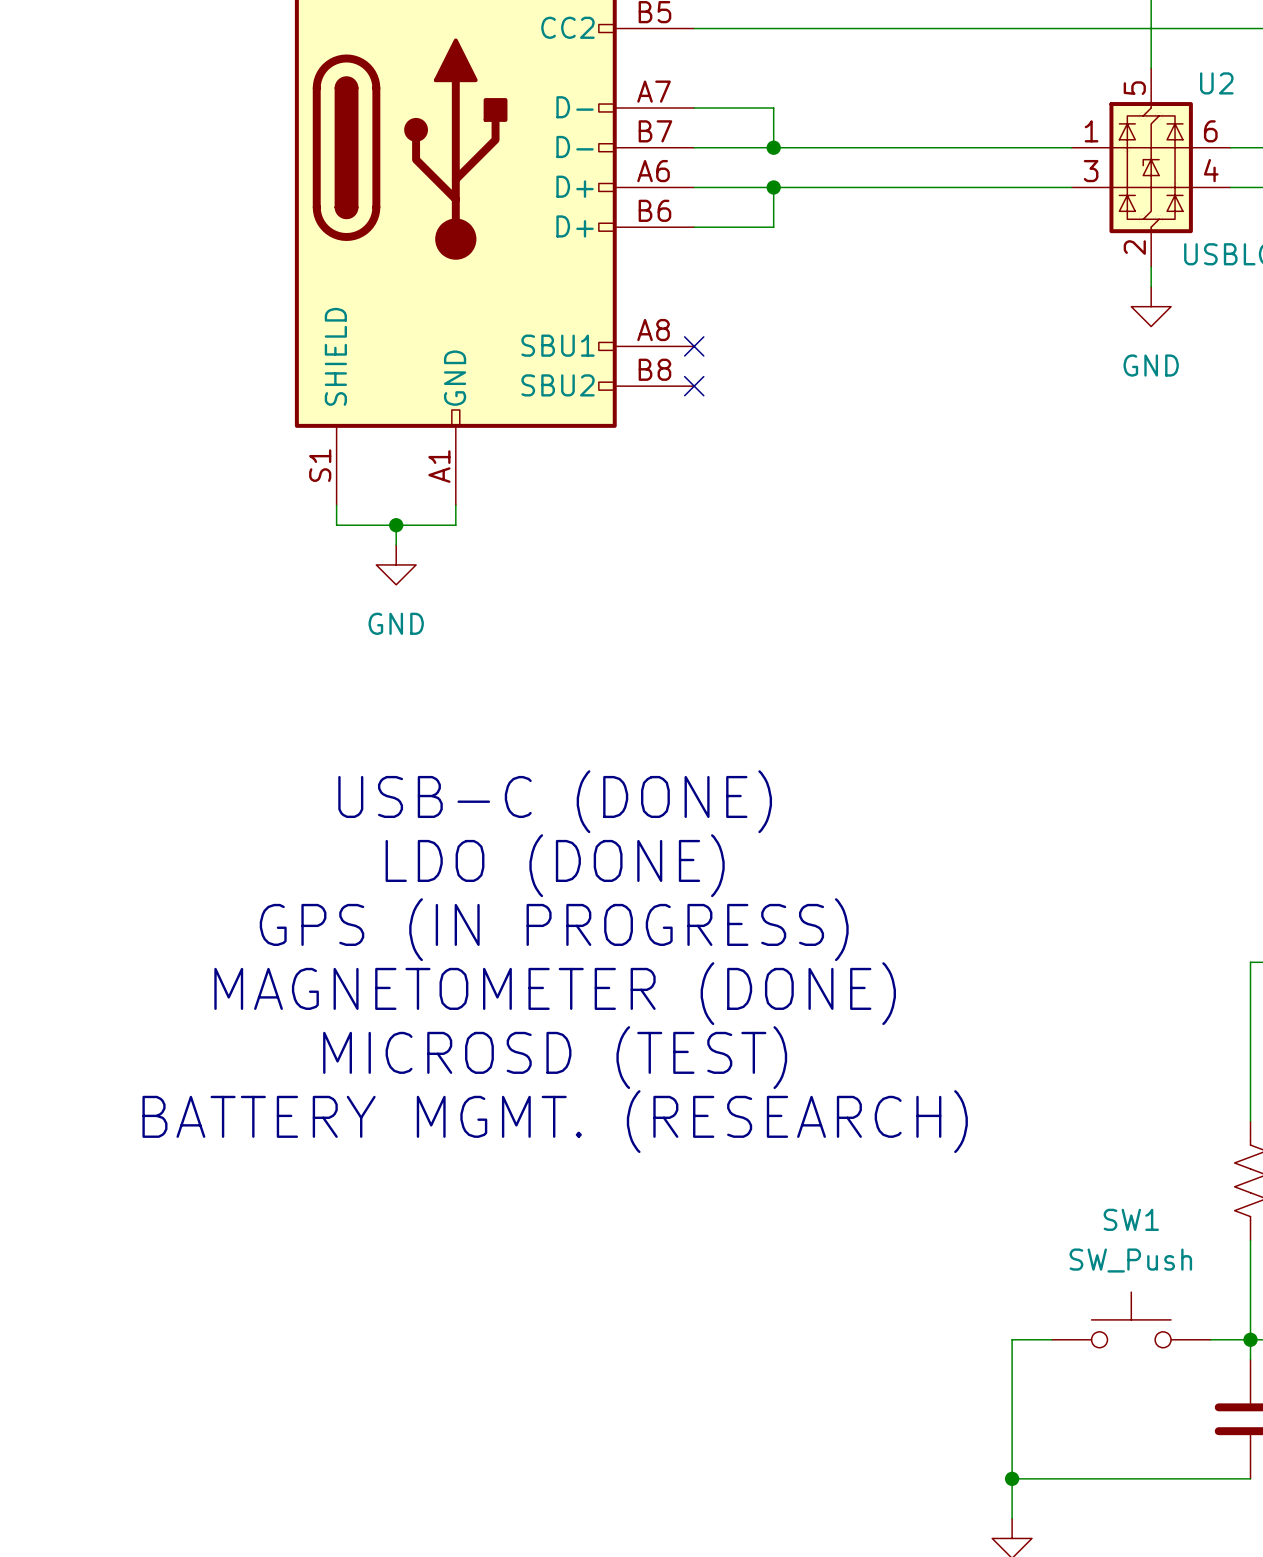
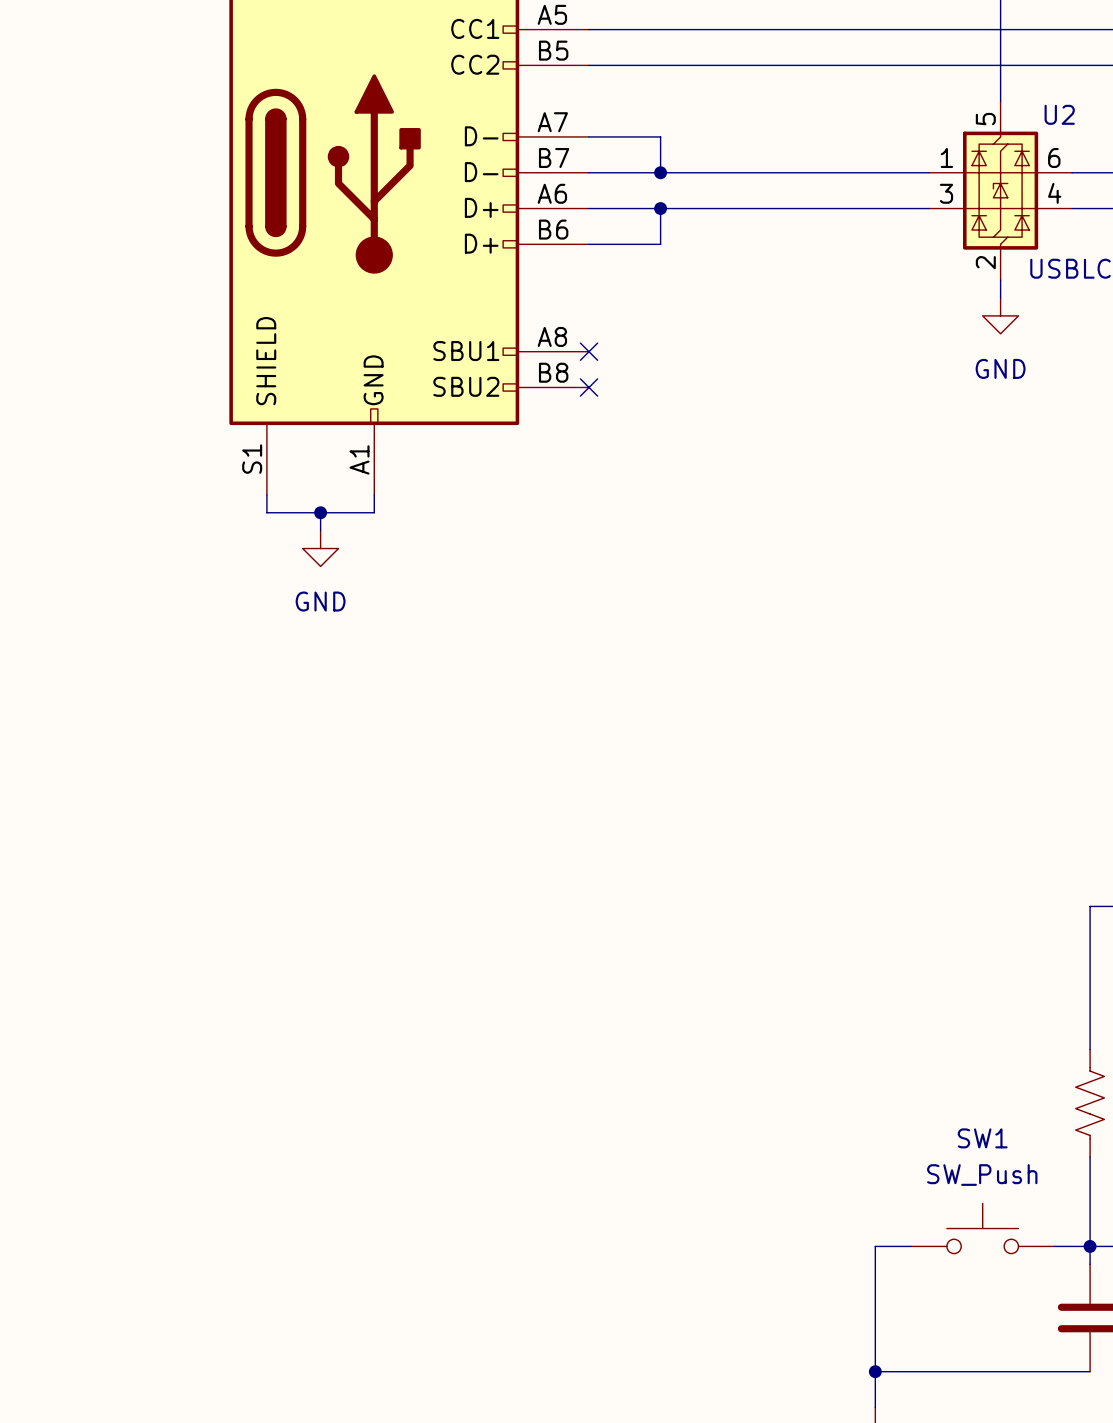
text: USB-C (DONE) (555, 801) -> none
text: LDO (DONE) (555, 865) -> none
text: GPS (IN PROGRESS) (554, 929) -> none
text: MAGNETOMETER (DONE) (555, 993) -> none
text: MICROSD (TEST) (555, 1057) -> none
text: BATTERY MGMT. (RESEARCH) (555, 1121) -> none

